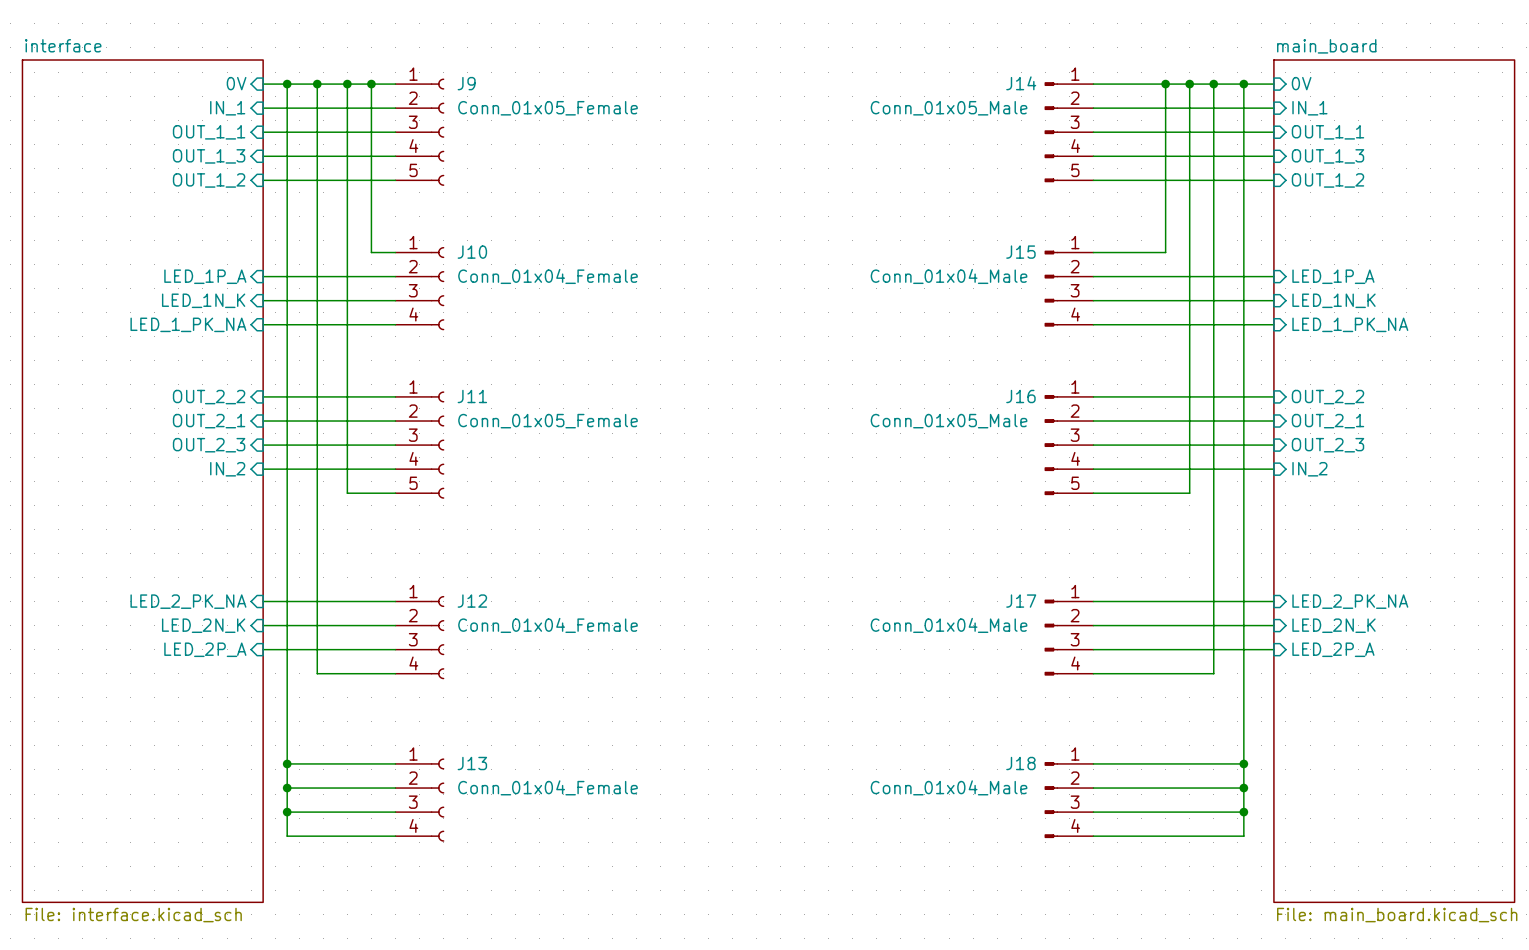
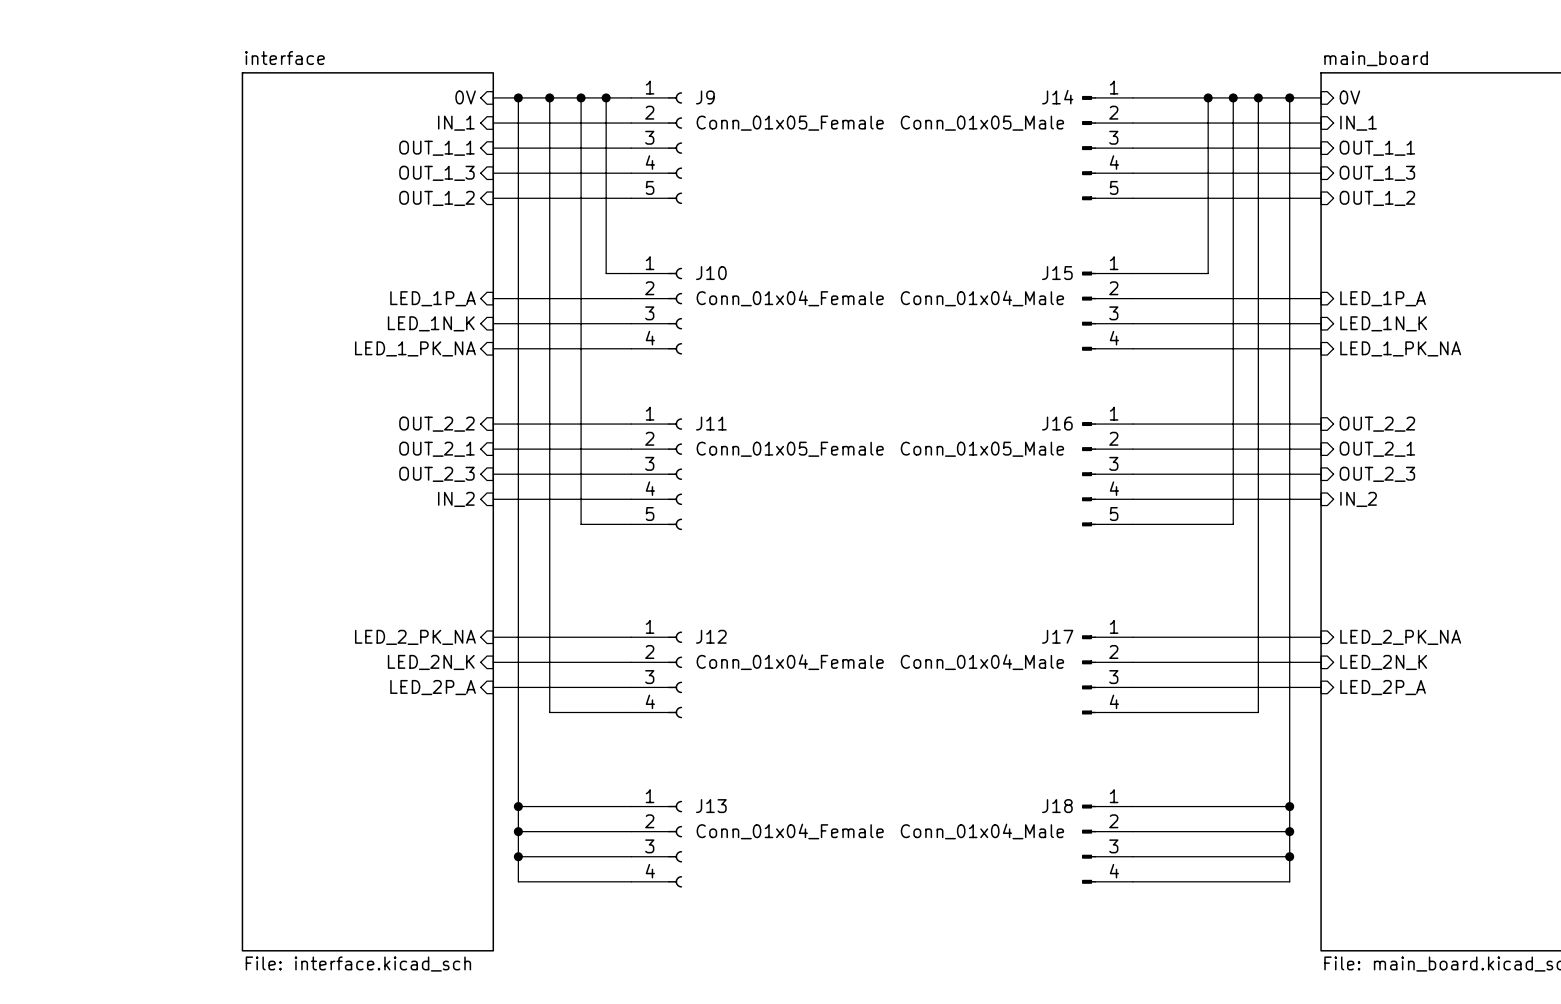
sheet pin position: 0V (236, 83) -> 0V (465, 97)
wire: (263, 84) (395, 84) -> (493, 97) (631, 97)
wire: (287, 84) (287, 836) (395, 836) -> (518, 97) (518, 881) (631, 881)
junction: (287, 84) -> none
wire: (317, 84) (317, 673) (395, 673) -> (549, 97) (549, 712) (631, 712)
junction: (317, 84) -> none
wire: (347, 84) (347, 493) (395, 493) -> (581, 97) (581, 524) (631, 524)
junction: (347, 84) -> none
wire: (371, 84) (371, 252) (395, 252) -> (606, 97) (606, 273) (631, 273)
junction: (371, 84) -> none
junction: none -> (518, 97)
junction: none -> (549, 97)
junction: none -> (581, 97)
junction: none -> (606, 97)
sheet pin position: IN_1 (227, 108) -> IN_1 (456, 123)
wire: (263, 108) (395, 108) -> (493, 123) (631, 123)
sheet pin position: OUT_1_1 (209, 132) -> OUT_1_1 (436, 148)
wire: (263, 132) (395, 132) -> (493, 148) (631, 148)
J9 position: (419, 132) -> (656, 148)
sheet pin position: OUT_1_3 (209, 156) -> OUT_1_3 (436, 173)
wire: (263, 156) (395, 156) -> (493, 173) (631, 173)
sheet pin position: OUT_1_2 (209, 180) -> OUT_1_2 (436, 198)
wire: (263, 180) (395, 180) -> (493, 198) (631, 198)
sheet pin position: LED_1P_A (205, 276) -> LED_1P_A (433, 298)
wire: (263, 276) (395, 276) -> (493, 298) (631, 298)
J10 position: (419, 288) -> (656, 311)
sheet pin position: LED_1N_K (203, 300) -> LED_1N_K (431, 323)
wire: (263, 300) (395, 300) -> (493, 323) (631, 323)
sheet pin position: LED_1_PK_NA (188, 324) -> LED_1_PK_NA (415, 348)
wire: (263, 324) (395, 324) -> (493, 348) (631, 348)
wire: (263, 396) (395, 396) -> (493, 424) (631, 424)
sheet pin position: OUT_2_2 (209, 397) -> OUT_2_2 (436, 424)
sheet pin position: OUT_2_1 (209, 421) -> OUT_2_1 (436, 449)
wire: (263, 421) (395, 421) -> (493, 449) (631, 449)
sheet pin position: OUT_2_3 (209, 445) -> OUT_2_3 (436, 474)
wire: (263, 445) (395, 445) -> (493, 474) (631, 474)
J11 position: (419, 445) -> (656, 474)
sheet pin position: IN_2 (227, 469) -> IN_2 (456, 499)
wire: (263, 469) (395, 469) -> (493, 499) (631, 499)
sheet interface position: (142, 481) -> (367, 511)
sheet pin position: LED_2_PK_NA (188, 601) -> LED_2_PK_NA (415, 637)
wire: (263, 601) (395, 601) -> (493, 637) (631, 637)
sheet pin position: LED_2N_K (203, 625) -> LED_2N_K (431, 662)
wire: (263, 625) (395, 625) -> (493, 662) (631, 662)
J12 position: (419, 637) -> (656, 674)
sheet pin position: LED_2P_A (205, 649) -> LED_2P_A (433, 687)
wire: (263, 649) (395, 649) -> (493, 687) (631, 687)
wire: (287, 763) (395, 763) -> (518, 806) (631, 806)
junction: (287, 763) -> none
junction: none -> (518, 806)
wire: (287, 788) (395, 788) -> (518, 831) (631, 831)
junction: (287, 788) -> none
junction: none -> (518, 831)
J13 position: (419, 800) -> (656, 844)
wire: (287, 812) (395, 812) -> (518, 856) (631, 856)
junction: (287, 812) -> none
junction: none -> (518, 856)

